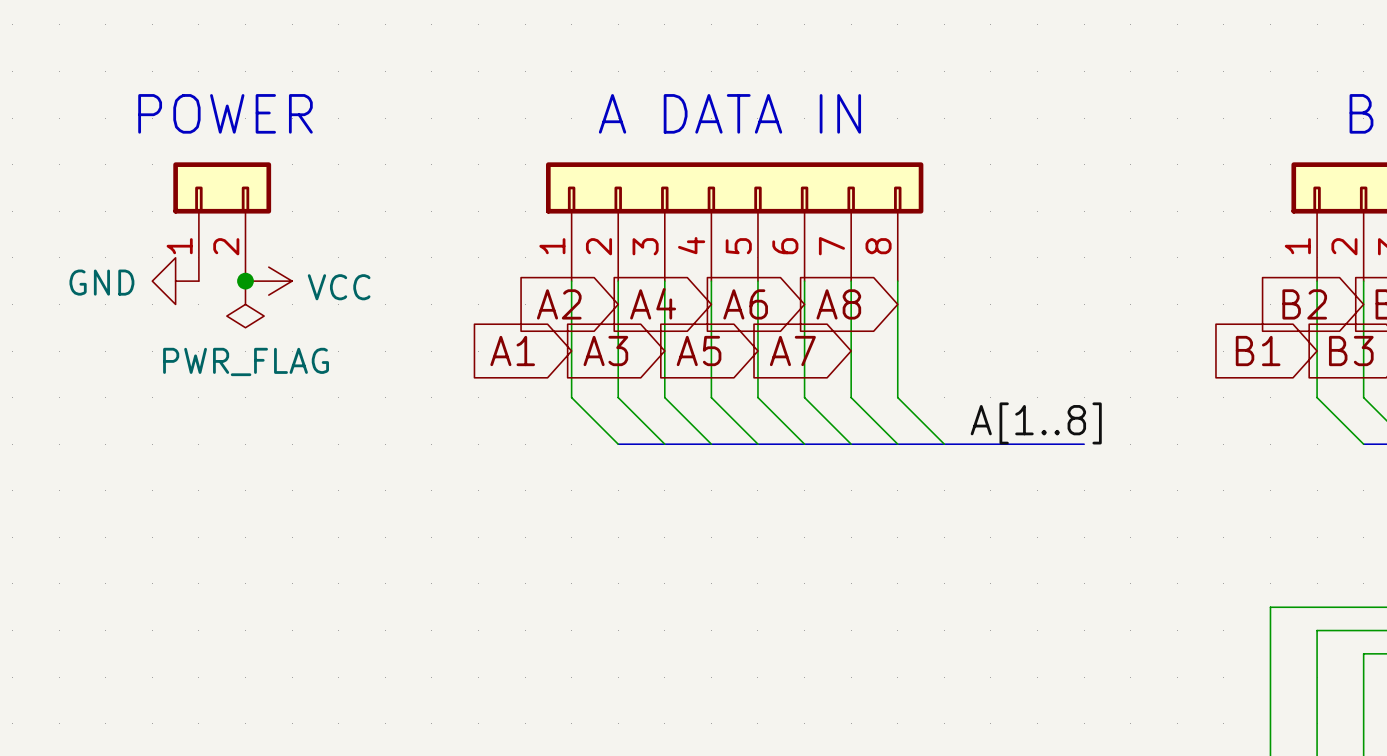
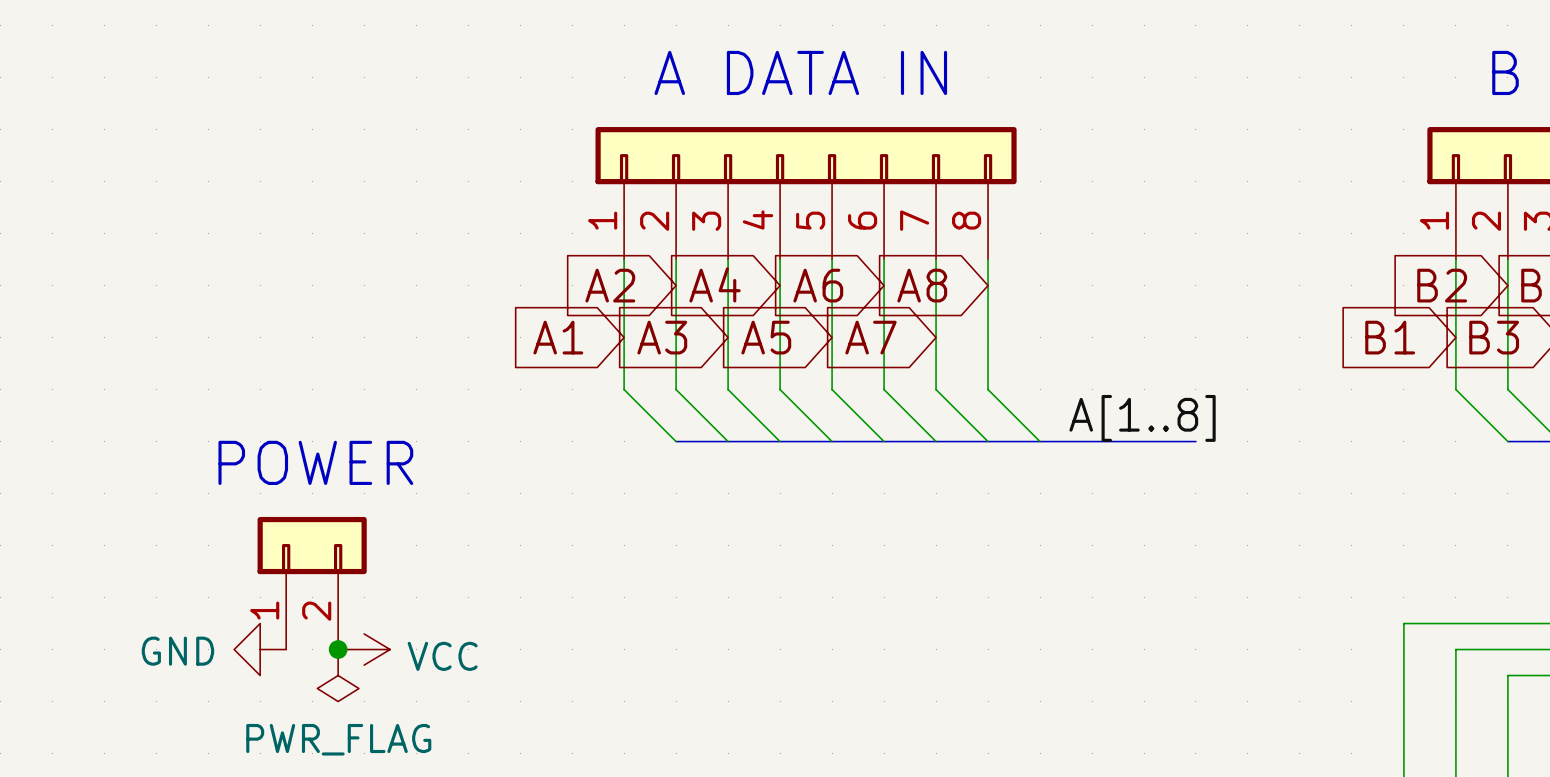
text position: POWER (225, 113) -> POWER (315, 462)
part position: (222, 221) -> (312, 583)
power symbol position: GND (175, 281) -> GND (260, 649)
junction: (245, 281) -> none
power symbol position: VCC (268, 281) -> VCC (364, 649)
power symbol position: PWR_FLAG (245, 304) -> PWR_FLAG (338, 675)
junction: none -> (338, 649)

